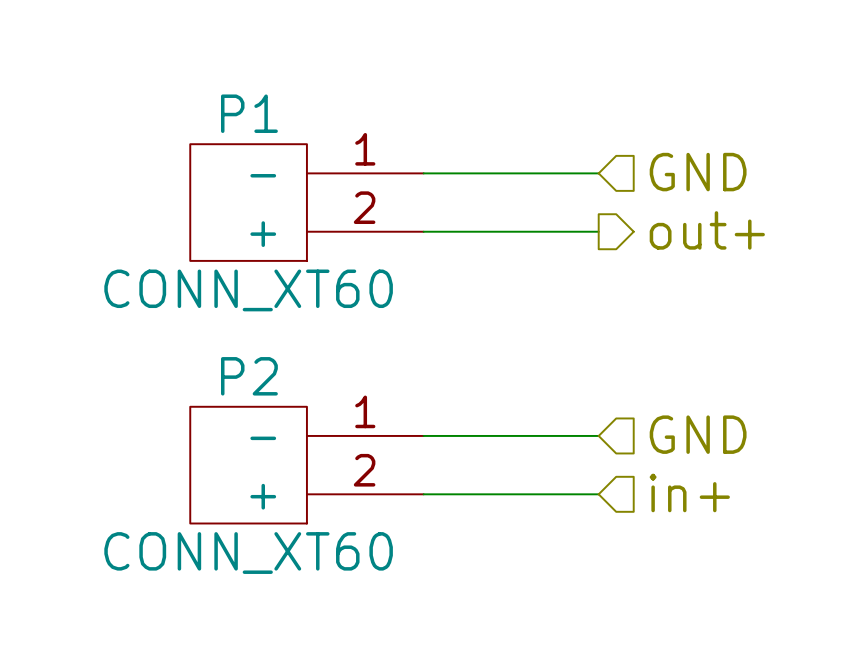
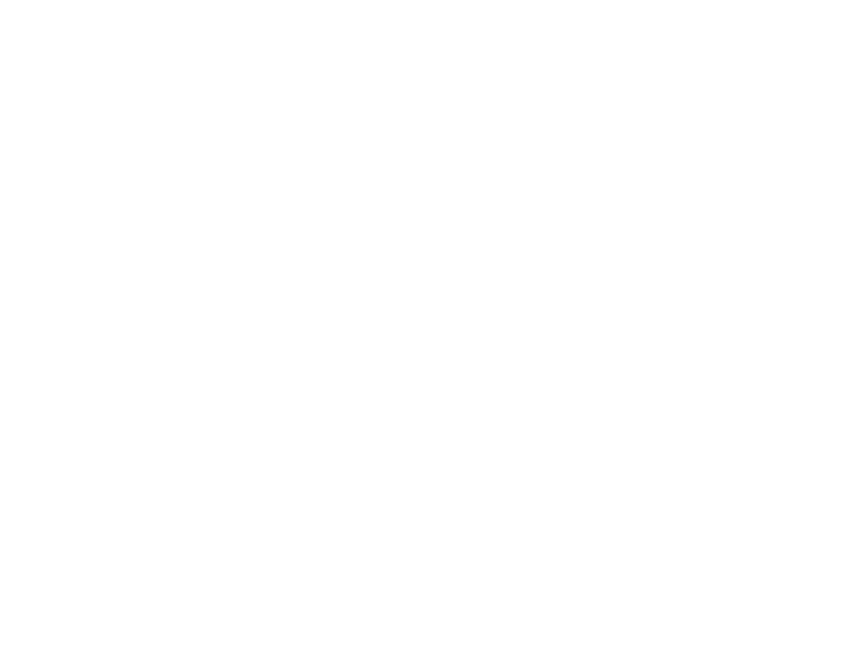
hierarchical label: GND (698, 172) -> none
wire: (423, 173) (598, 173) -> none
P1: CONN_XT60 (306, 202) -> none
hierarchical label: out+ (707, 230) -> none
wire: (423, 231) (598, 231) -> none
hierarchical label: GND (698, 434) -> none
wire: (423, 435) (598, 435) -> none
P2: CONN_XT60 (306, 465) -> none
hierarchical label: in+ (689, 493) -> none
wire: (423, 494) (598, 494) -> none

